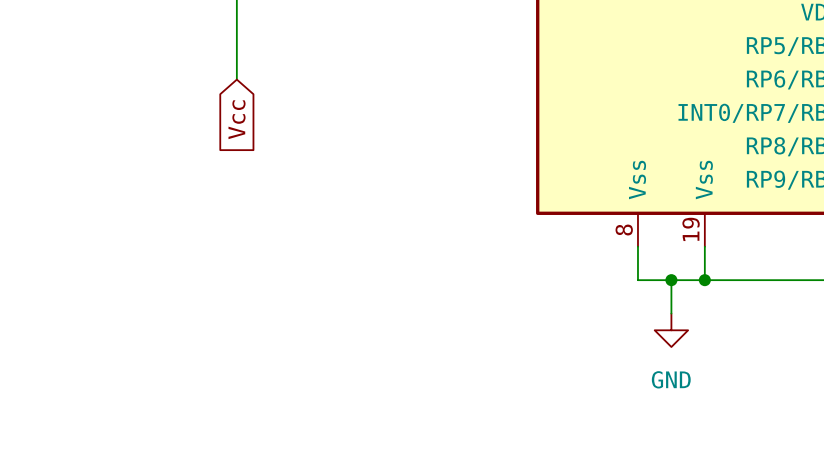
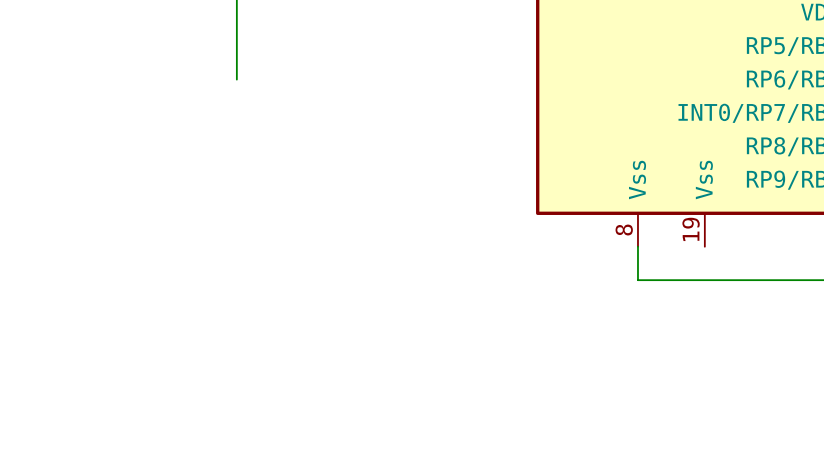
global label: Vcc (237, 119) -> none
wire: (704, 246) (704, 280) -> none
wire: (671, 280) (671, 313) -> none
junction: (671, 280) -> none
junction: (704, 280) -> none
power symbol: GND (671, 330) -> none

